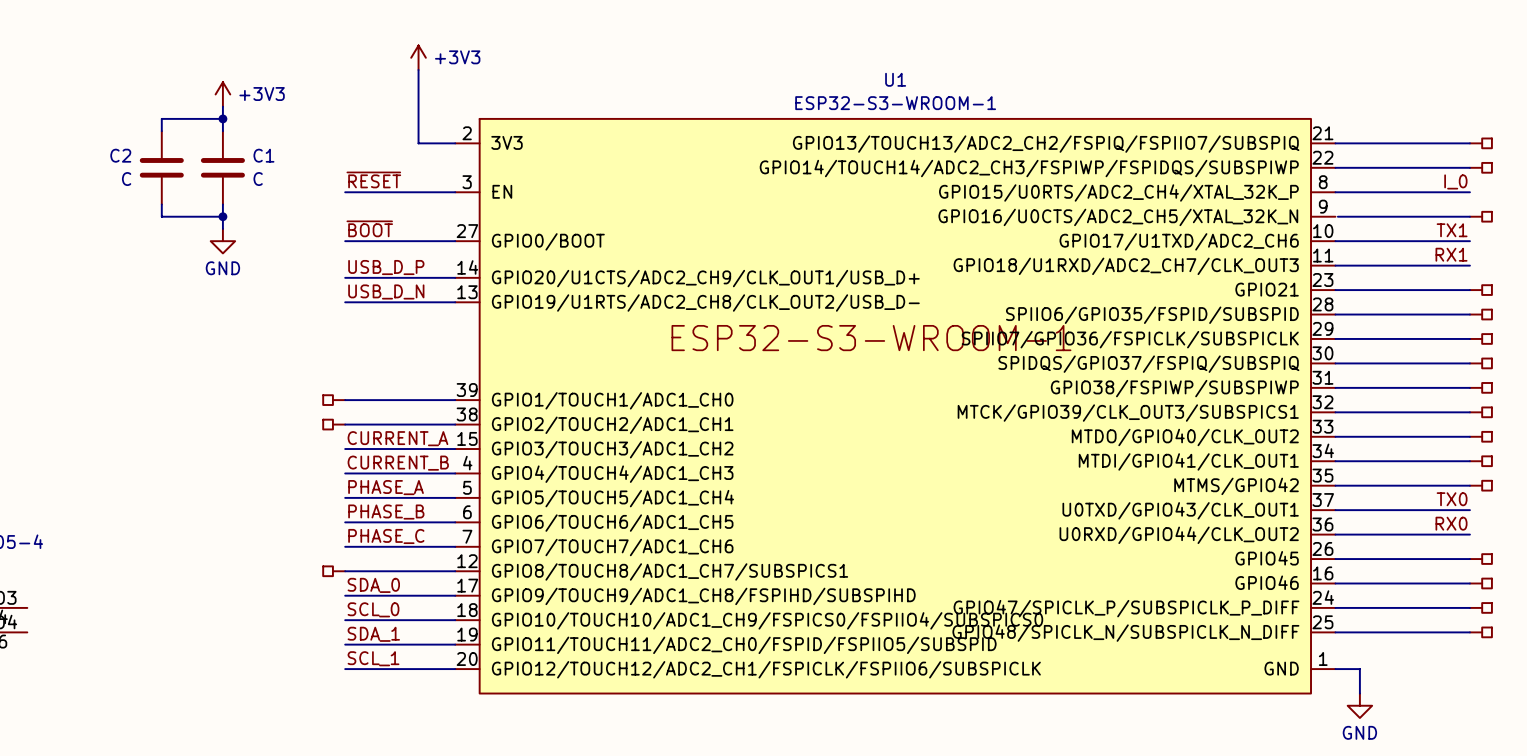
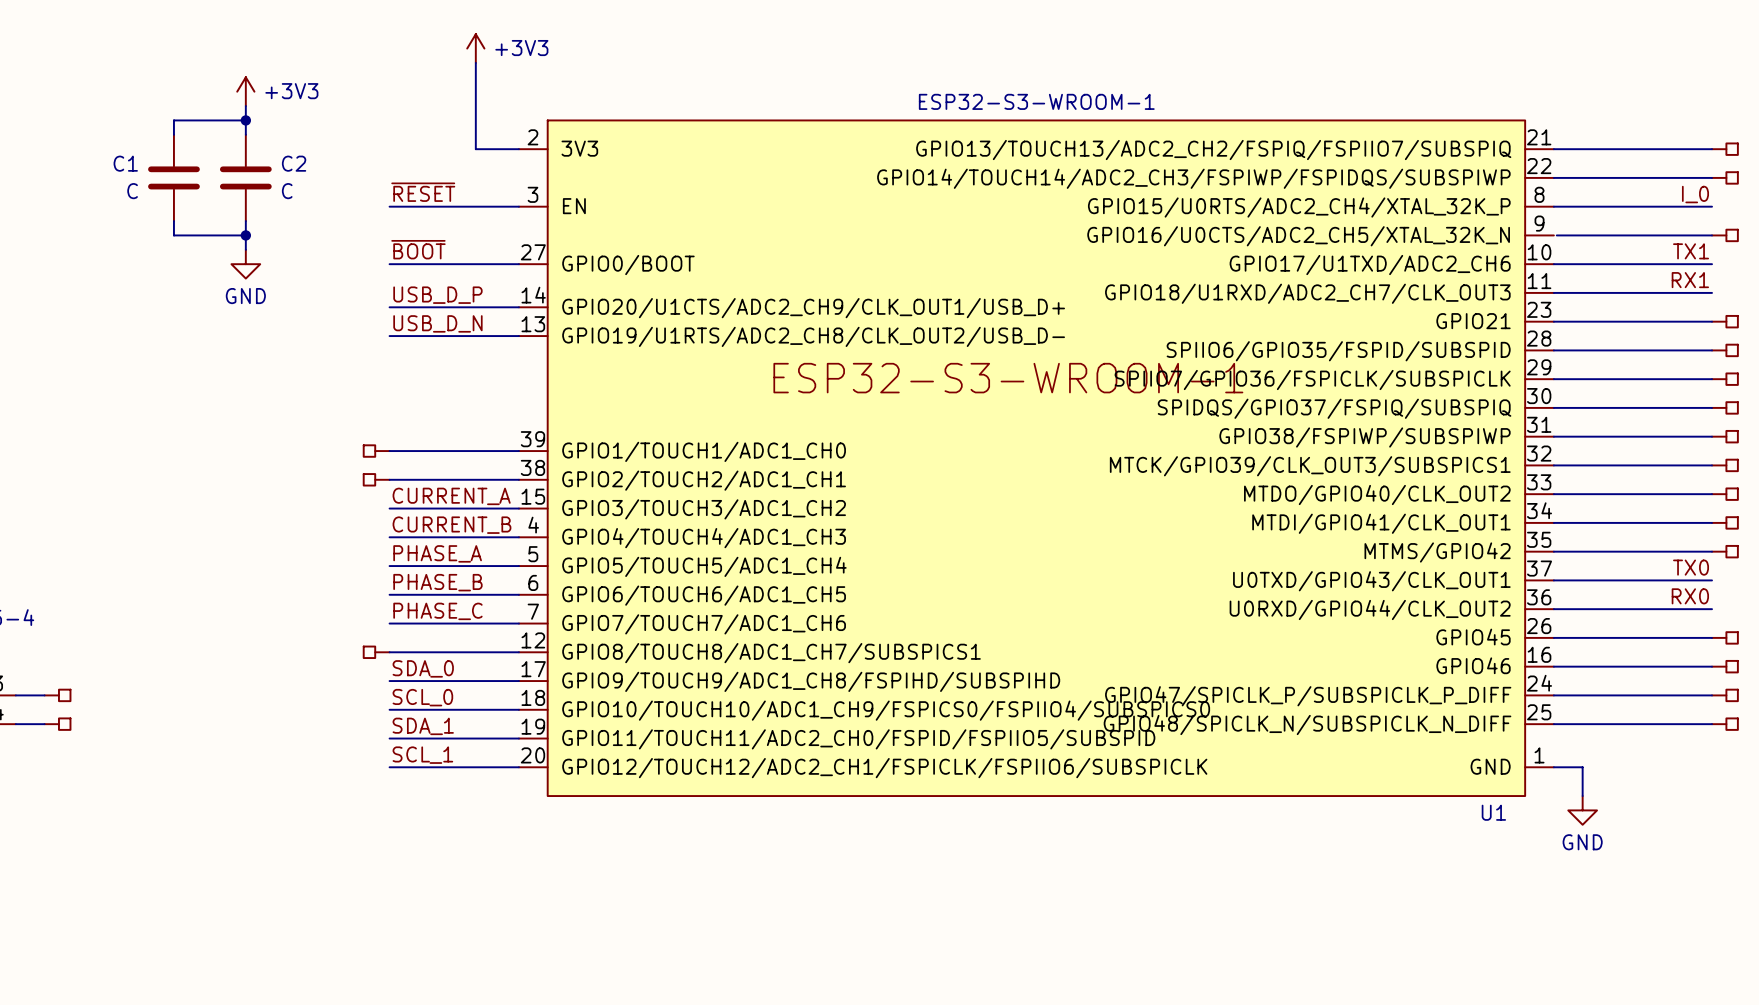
U1 name position: U1 (895, 79) -> U1 (1493, 812)
C2 name: C2 (120, 155) -> C1 (125, 163)
C1 name: C1 (263, 155) -> C2 (294, 163)
wire: none -> (15, 695) (44, 695)
part: none -> (57, 695)
wire: none -> (15, 724) (44, 724)
part: none -> (57, 724)

